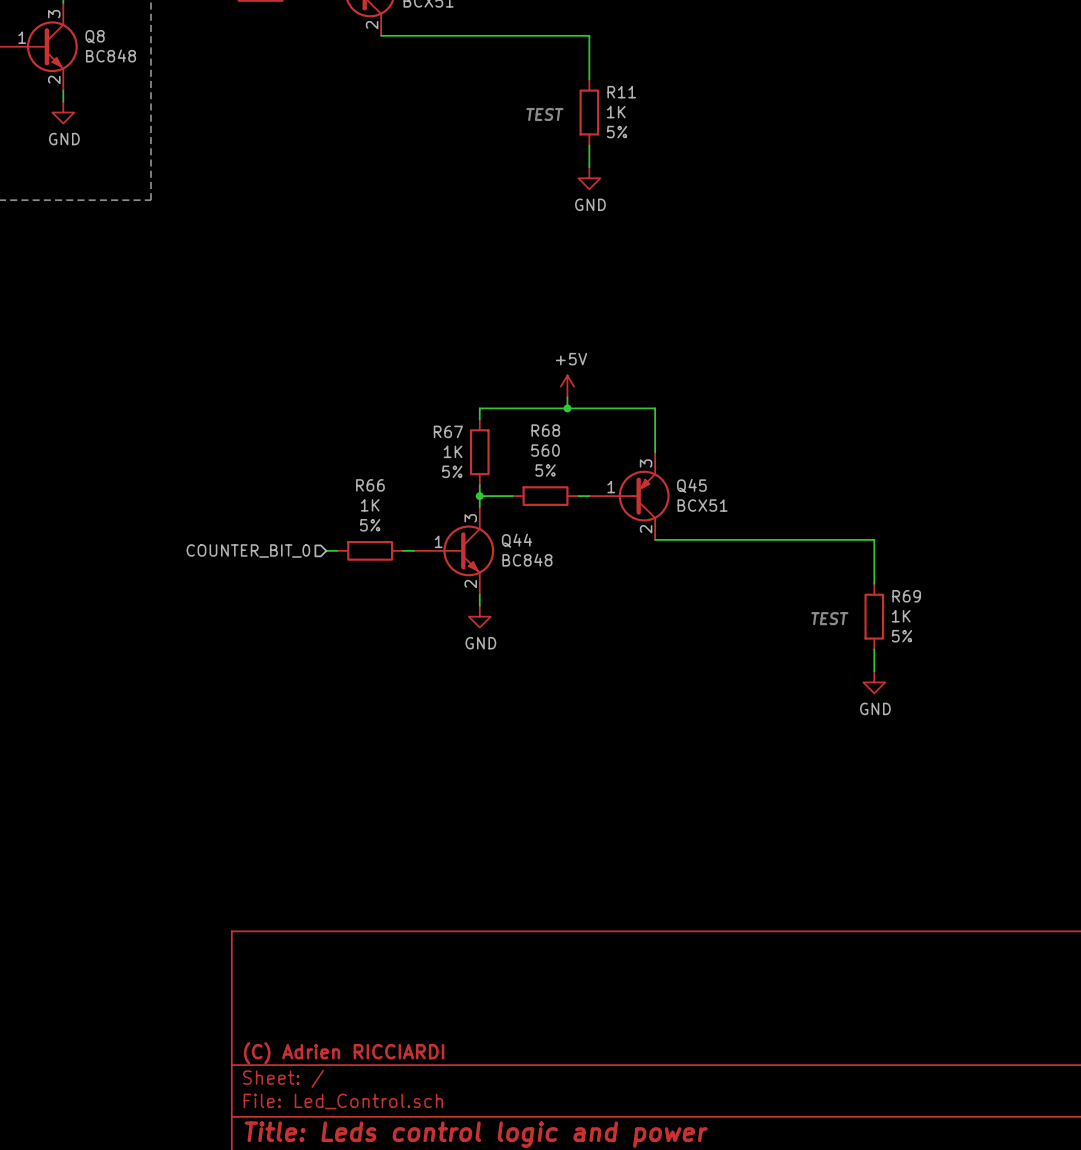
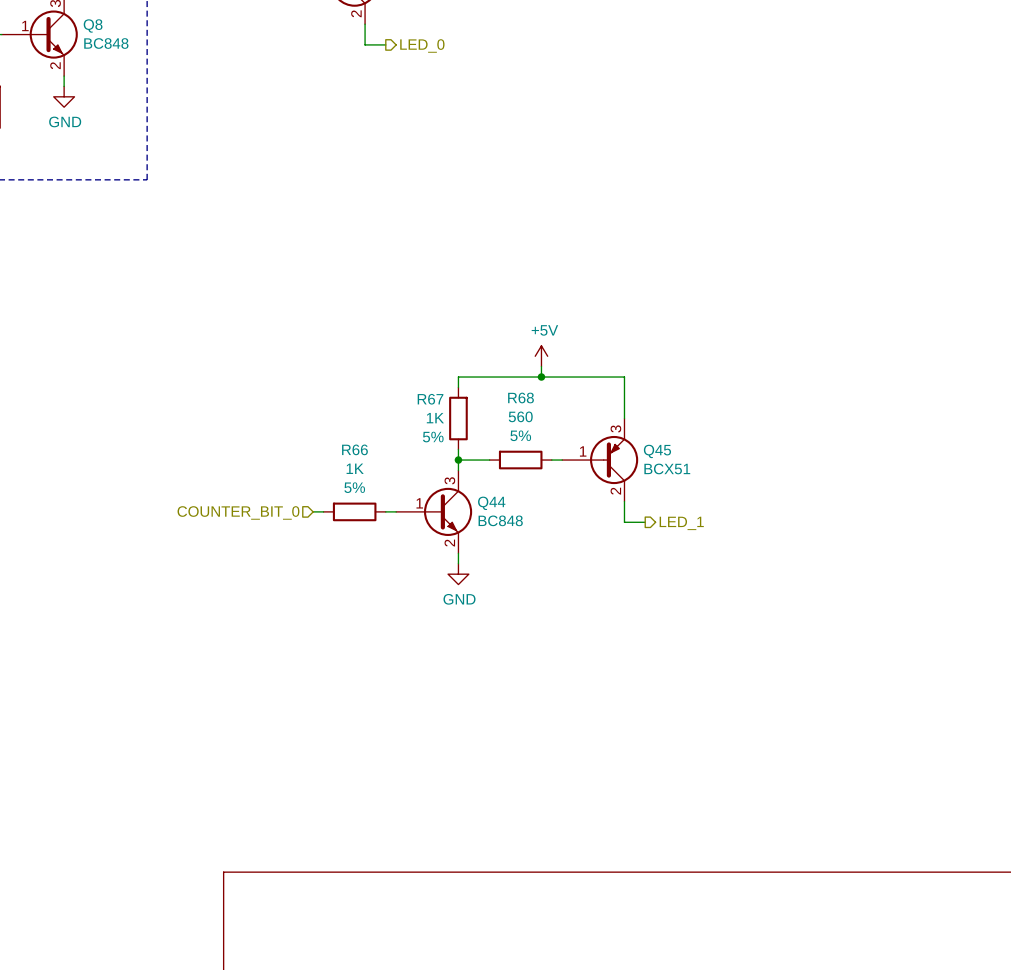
wire: (381, 35) (589, 35) (589, 79) -> (365, 24) (365, 44) (385, 44)
hierarchical label: none -> LED_0 (422, 45)
R11: 1K (589, 112) -> none
text: TEST (544, 114) -> none
wire: (589, 145) (589, 167) -> none
power symbol: GND (589, 178) -> none
wire: (655, 539) (874, 539) (874, 583) -> (624, 501) (624, 522) (645, 522)
hierarchical label: none -> LED_1 (681, 523)
R69: 1K (874, 616) -> none
text: TEST (829, 618) -> none
wire: (874, 649) (874, 671) -> none
power symbol: GND (874, 682) -> none

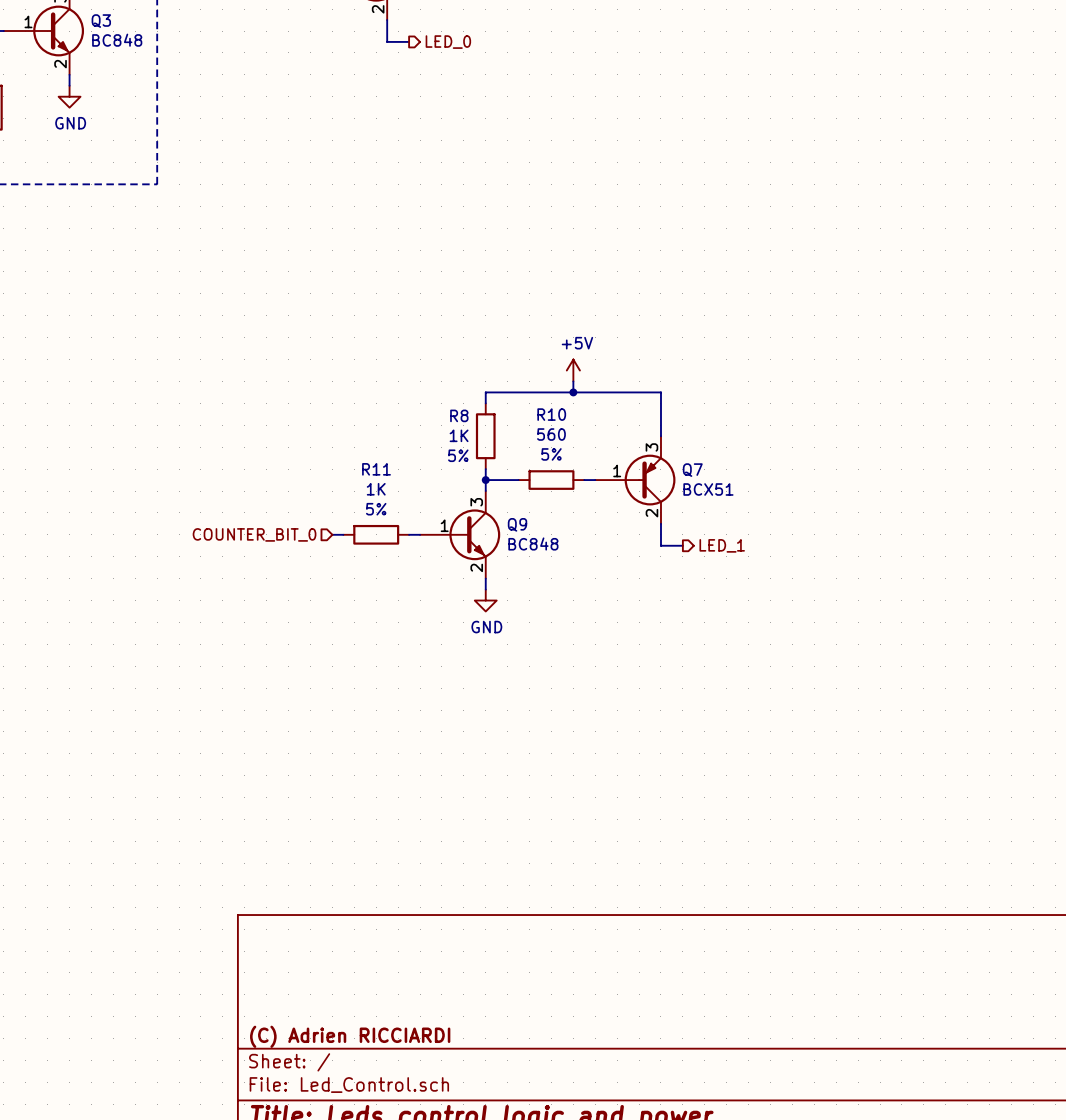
Q8 name: Q8 (93, 25) -> Q3 (101, 21)
R68 name: R68 (521, 397) -> R10 (551, 414)
R67 name: R67 (430, 399) -> R8 (459, 415)
R66 name: R66 (354, 449) -> R11 (376, 469)
Q45 name: Q45 (657, 451) -> Q7 (692, 470)
Q44 name: Q44 (491, 503) -> Q9 (517, 524)

